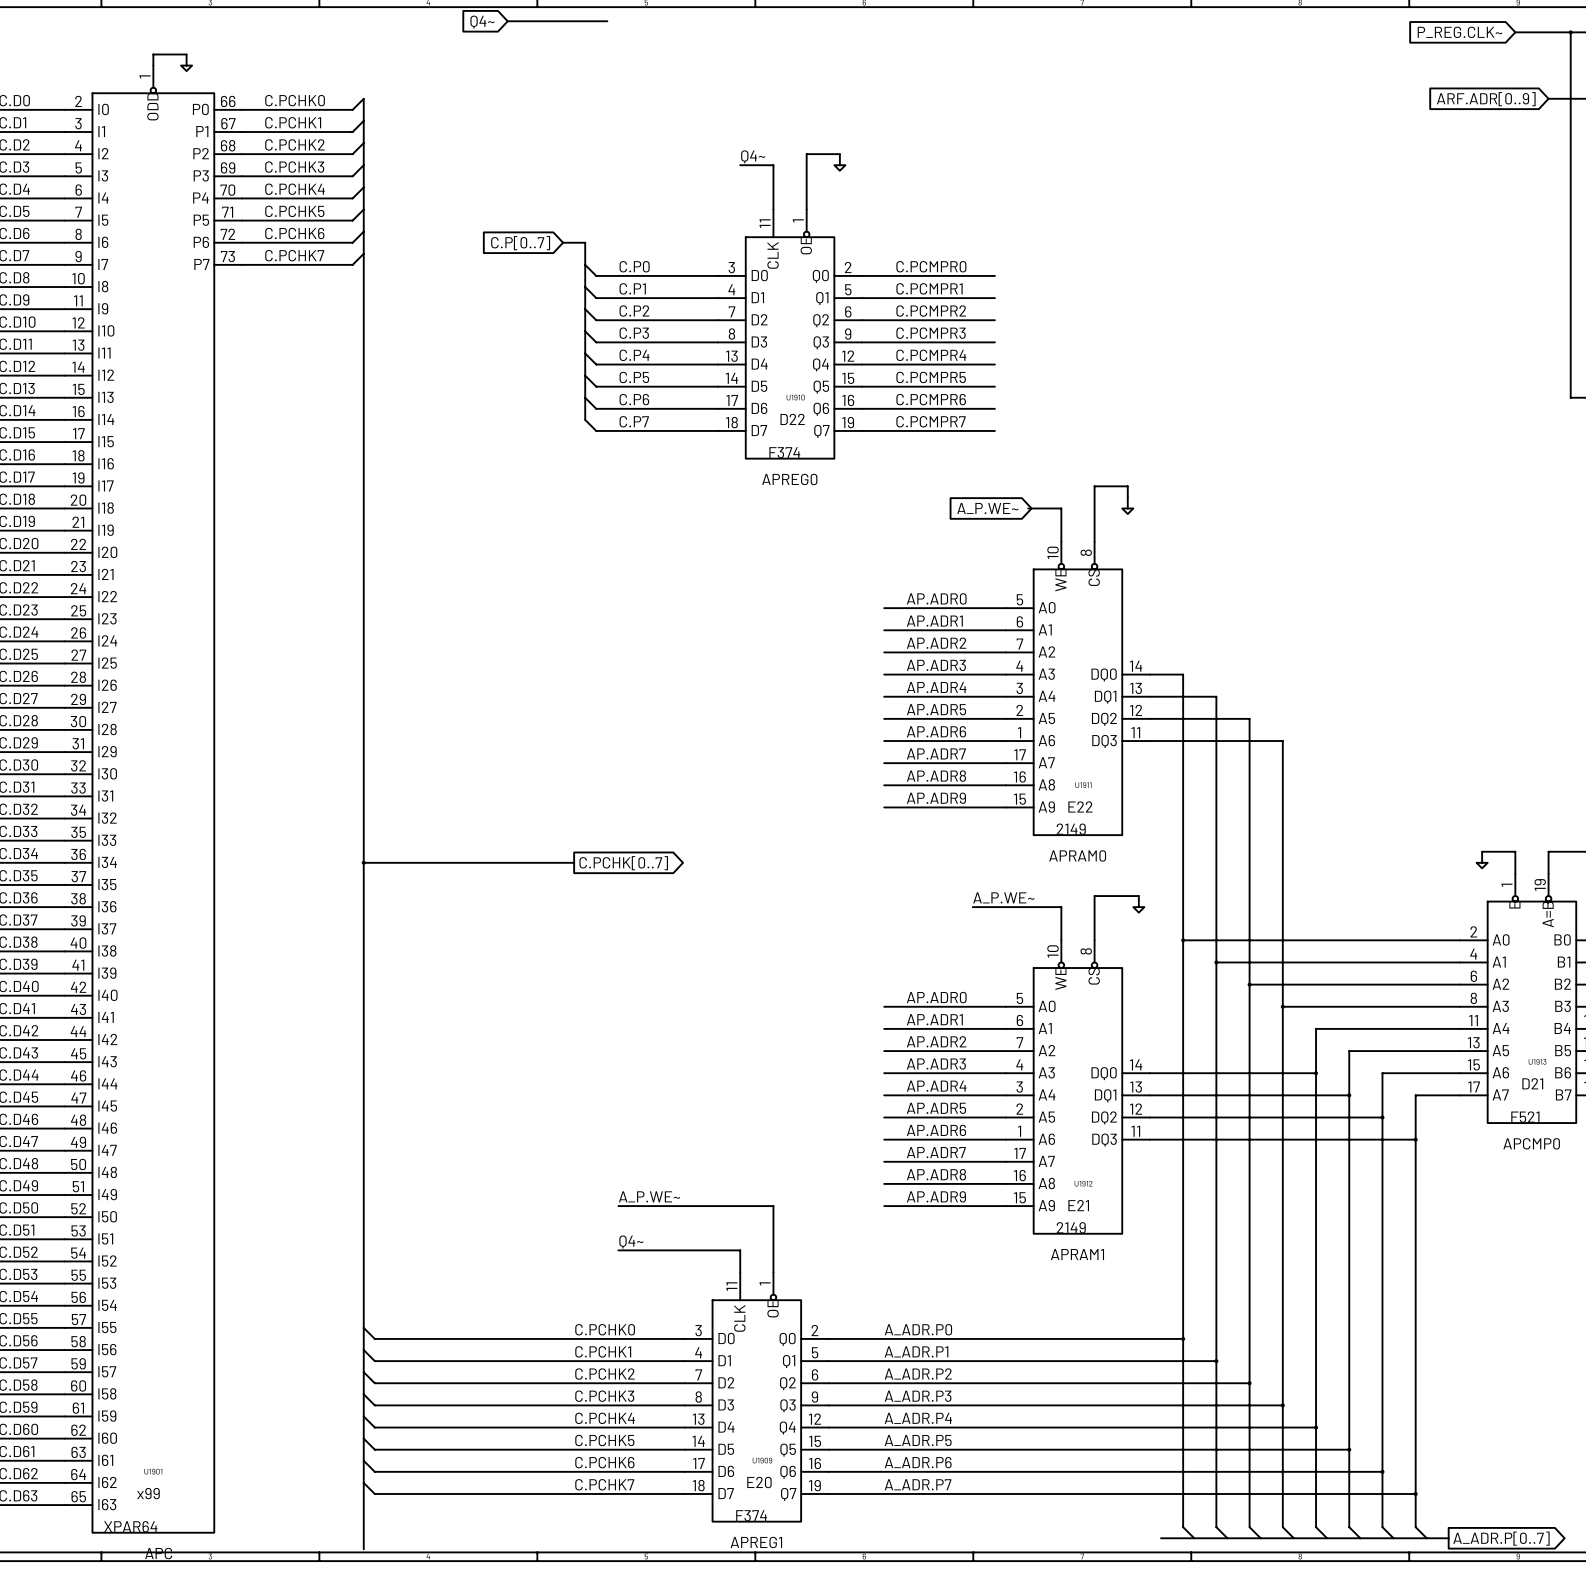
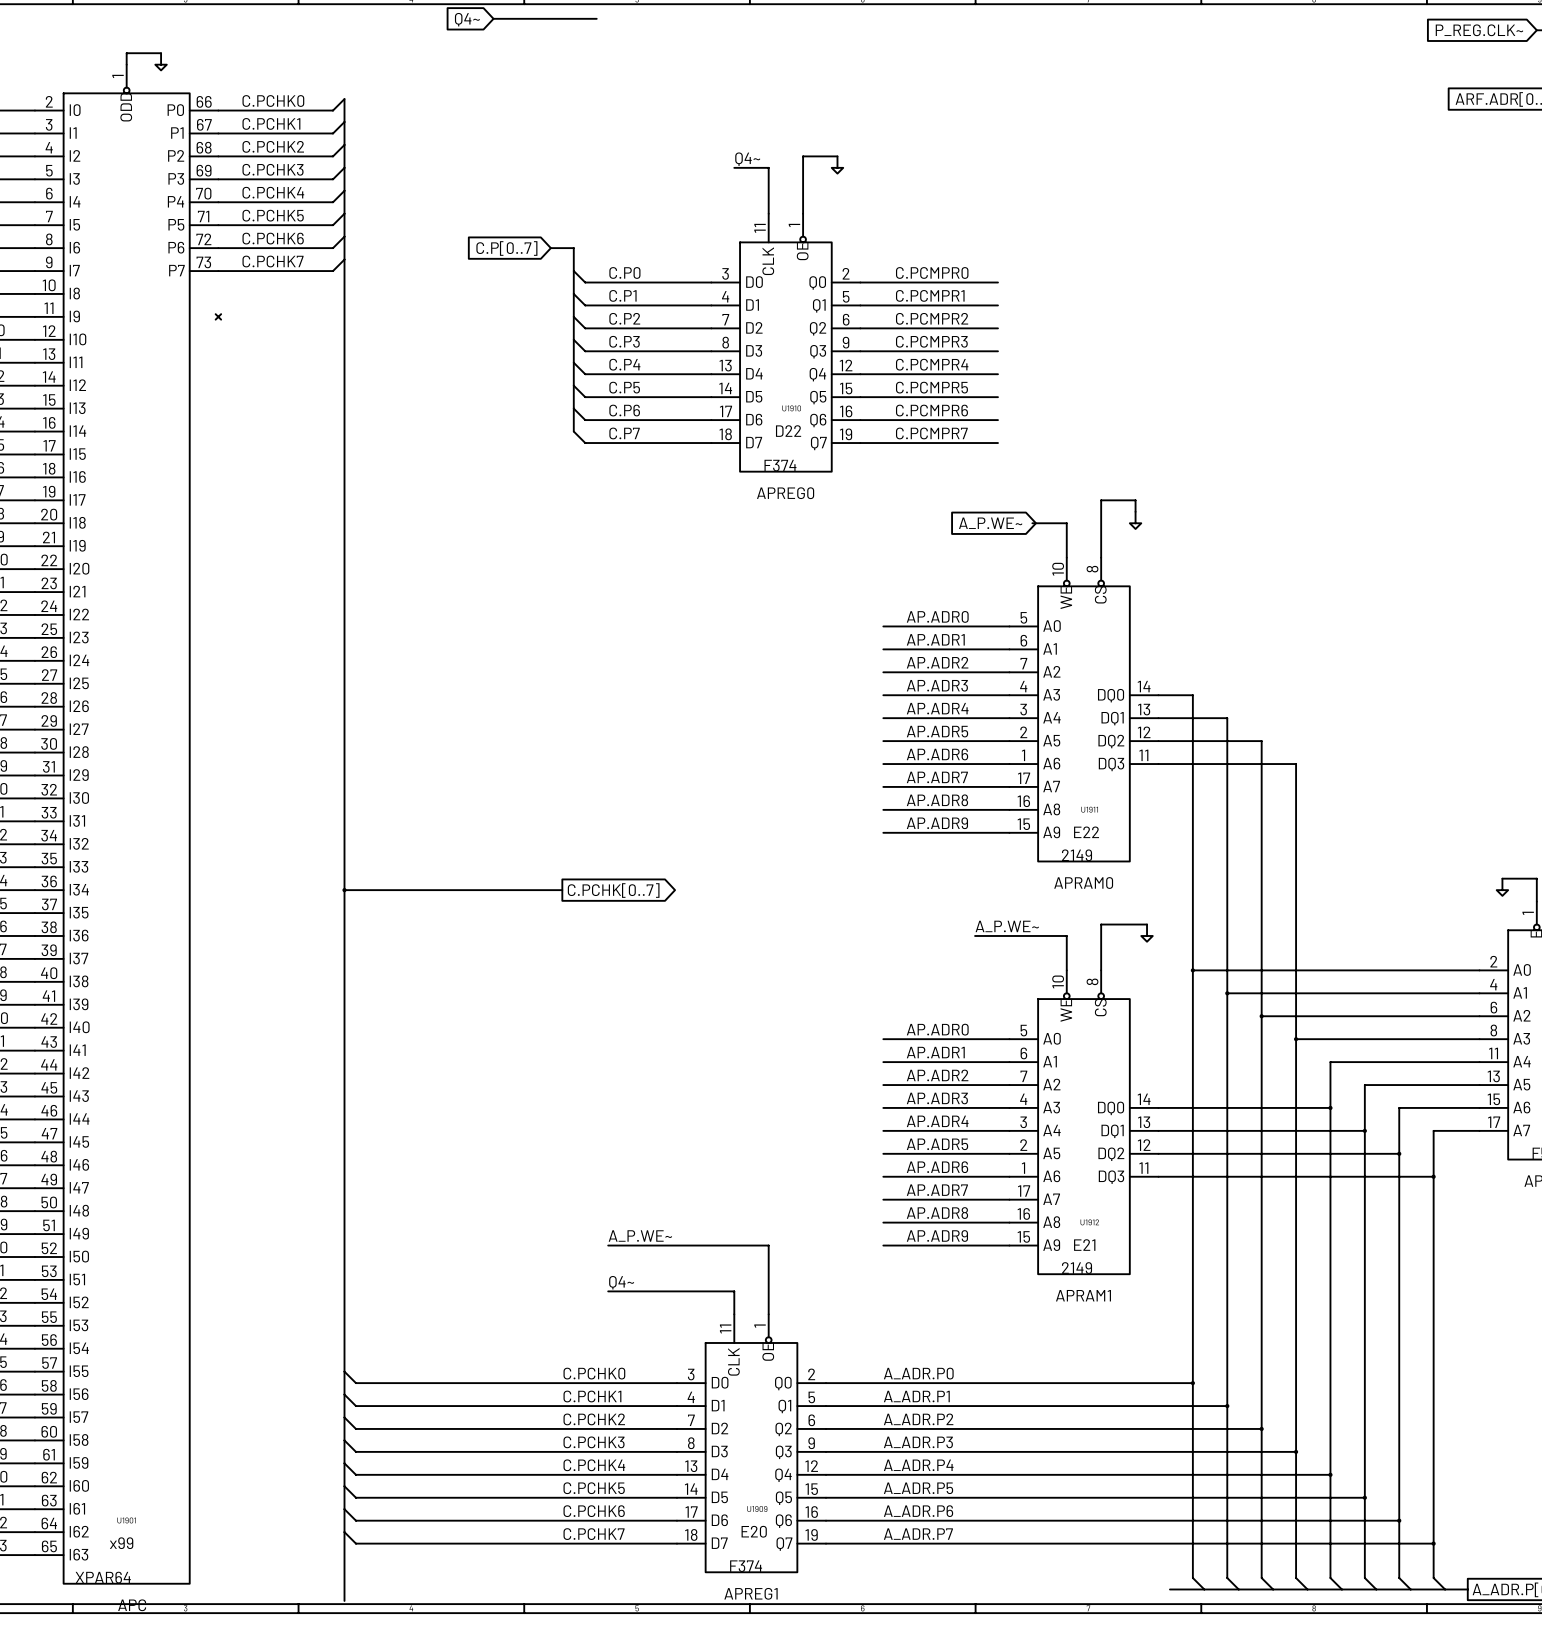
no-connect mark: none -> (218, 316)

